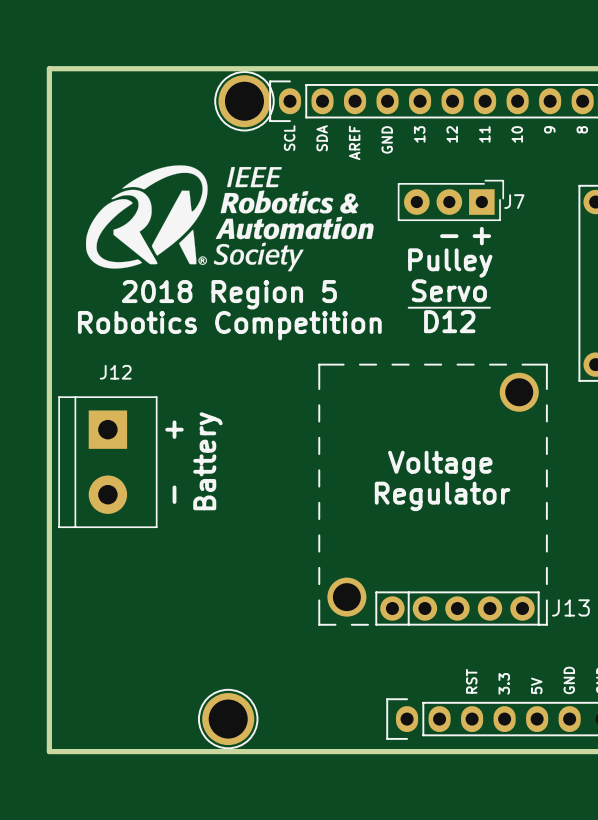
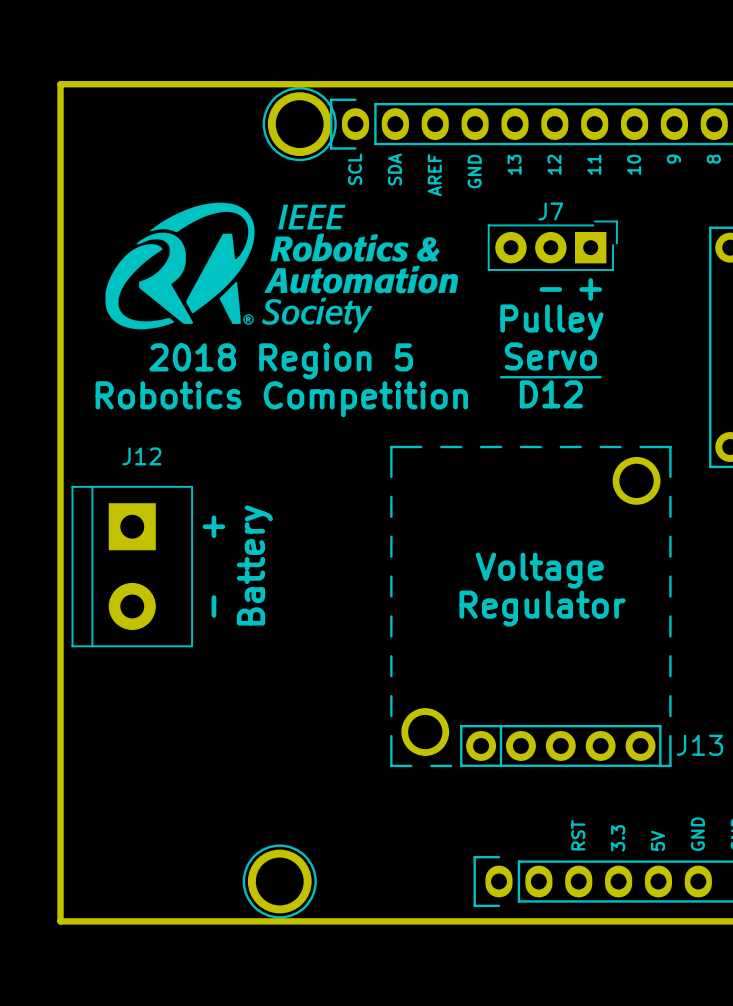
J7 name position: J7 (514, 201) -> J7 (550, 211)

